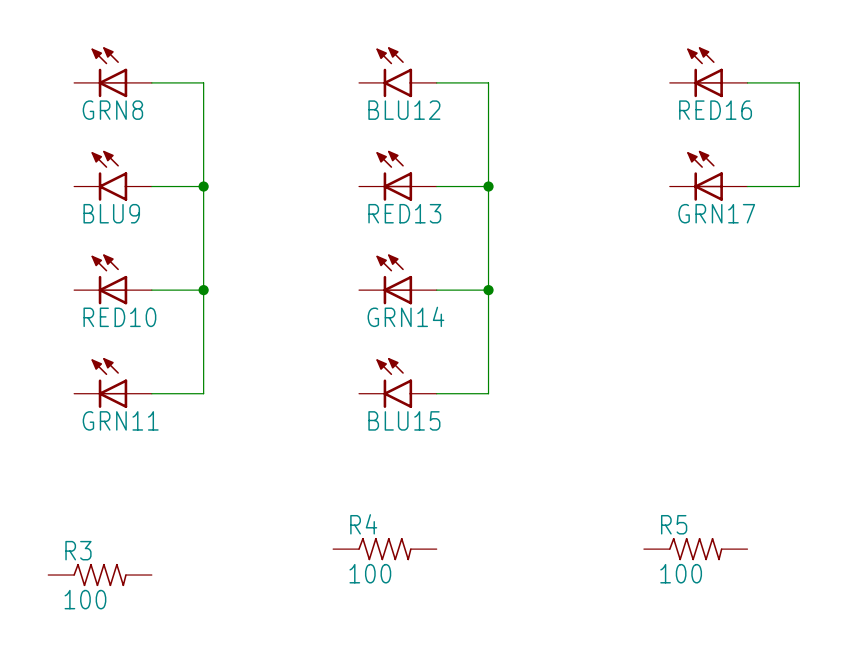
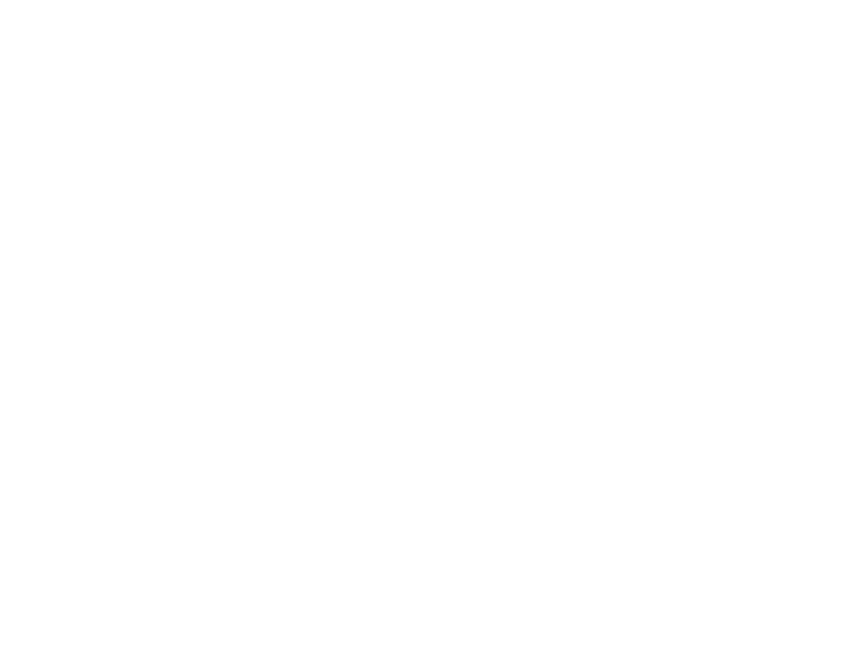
GRN8: (112, 72) -> none
BLU12: (397, 72) -> none
RED16: (708, 72) -> none
wire: (151, 82) (203, 82) (203, 393) (151, 393) -> none
wire: (436, 82) (488, 82) (488, 393) (436, 393) -> none
wire: (747, 82) (799, 82) (799, 186) (747, 186) -> none
BLU9: (112, 175) -> none
RED13: (397, 175) -> none
GRN17: (708, 175) -> none
wire: (151, 186) (203, 186) -> none
junction: (203, 186) -> none
wire: (436, 186) (488, 186) -> none
junction: (488, 186) -> none
RED10: (112, 279) -> none
GRN14: (397, 279) -> none
wire: (151, 290) (203, 290) -> none
junction: (203, 290) -> none
wire: (436, 290) (488, 290) -> none
junction: (488, 290) -> none
GRN11: (112, 382) -> none
BLU15: (397, 382) -> none
R4: 100 (384, 549) -> none
R5: 100 (695, 549) -> none
R3: 100 (100, 575) -> none

